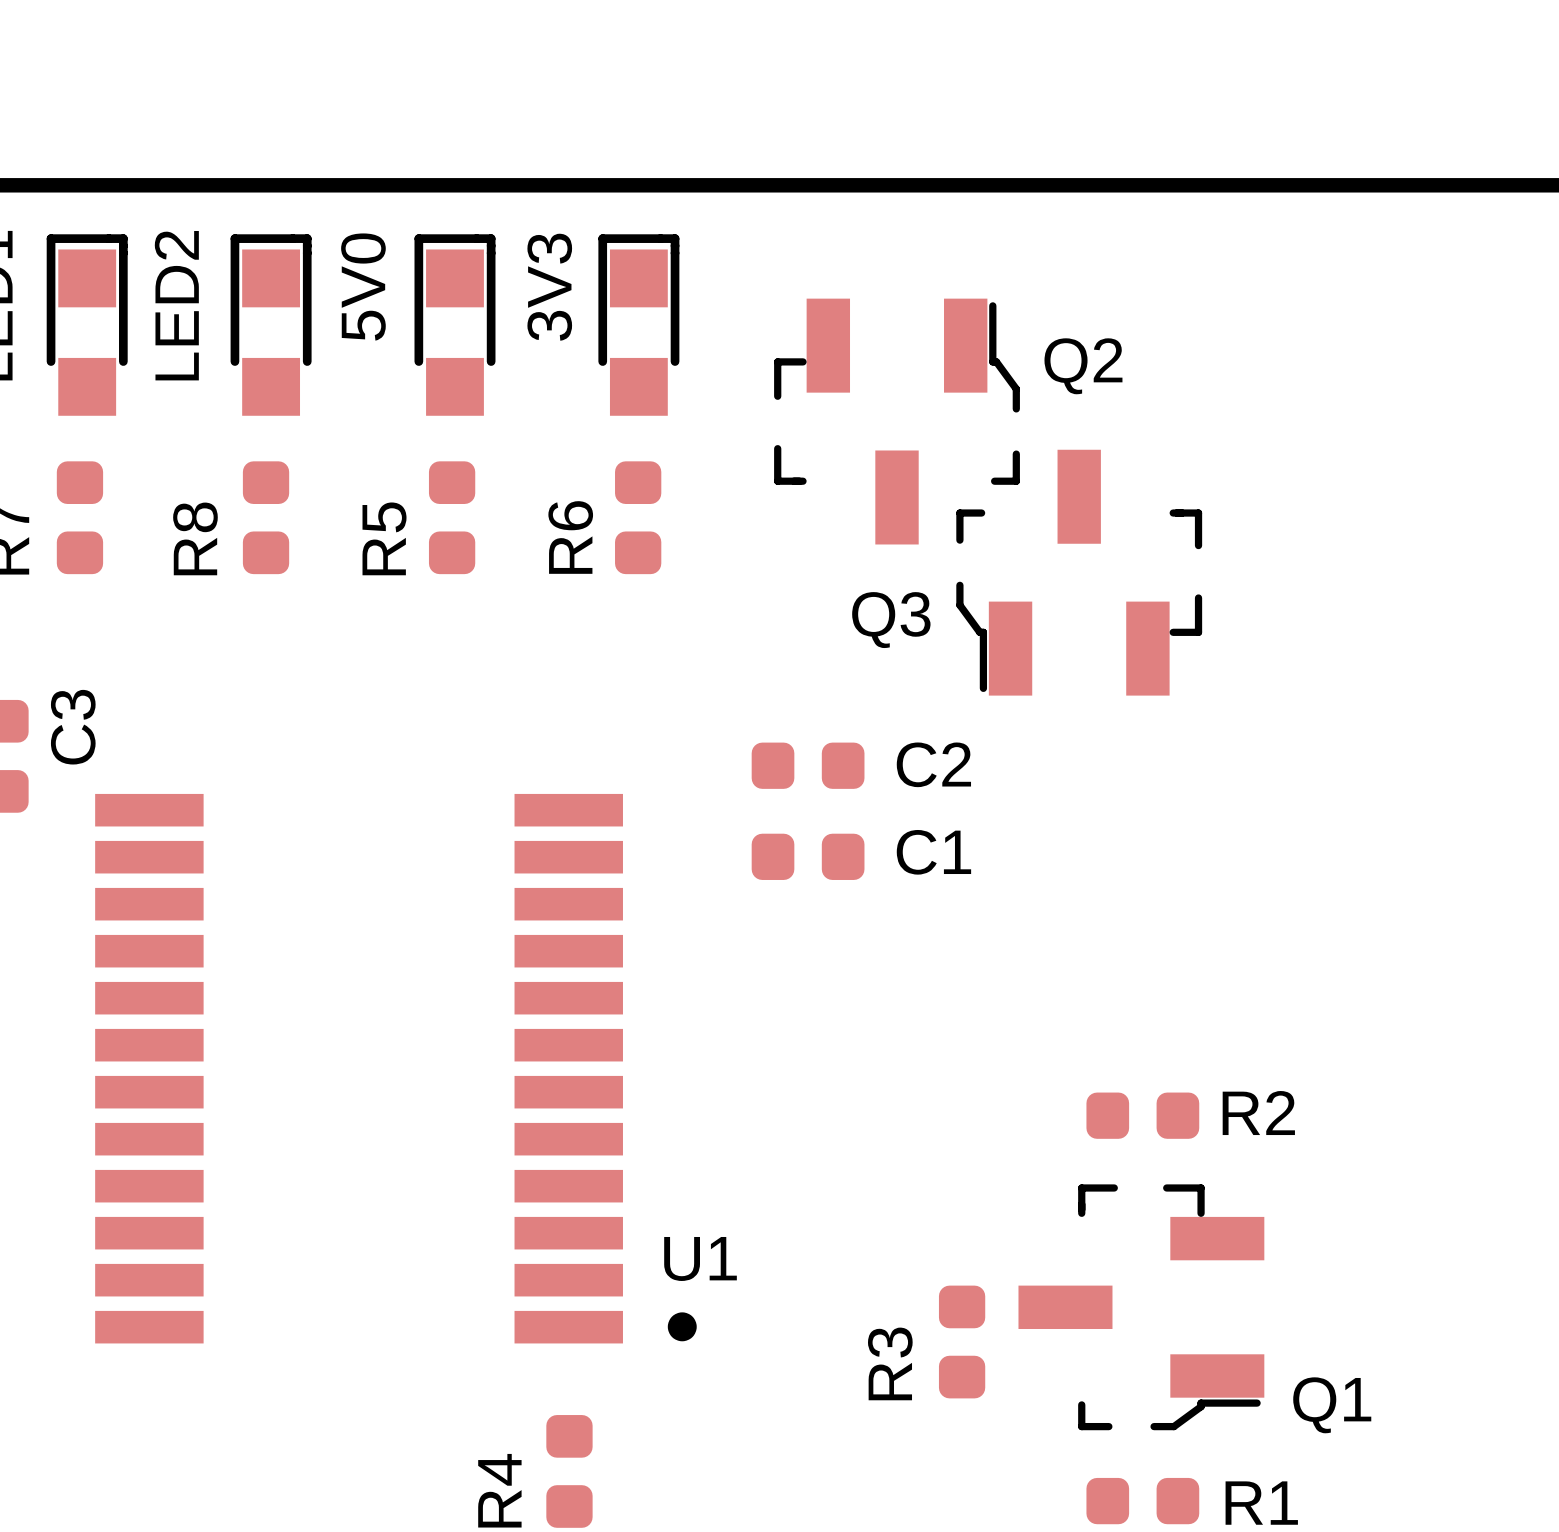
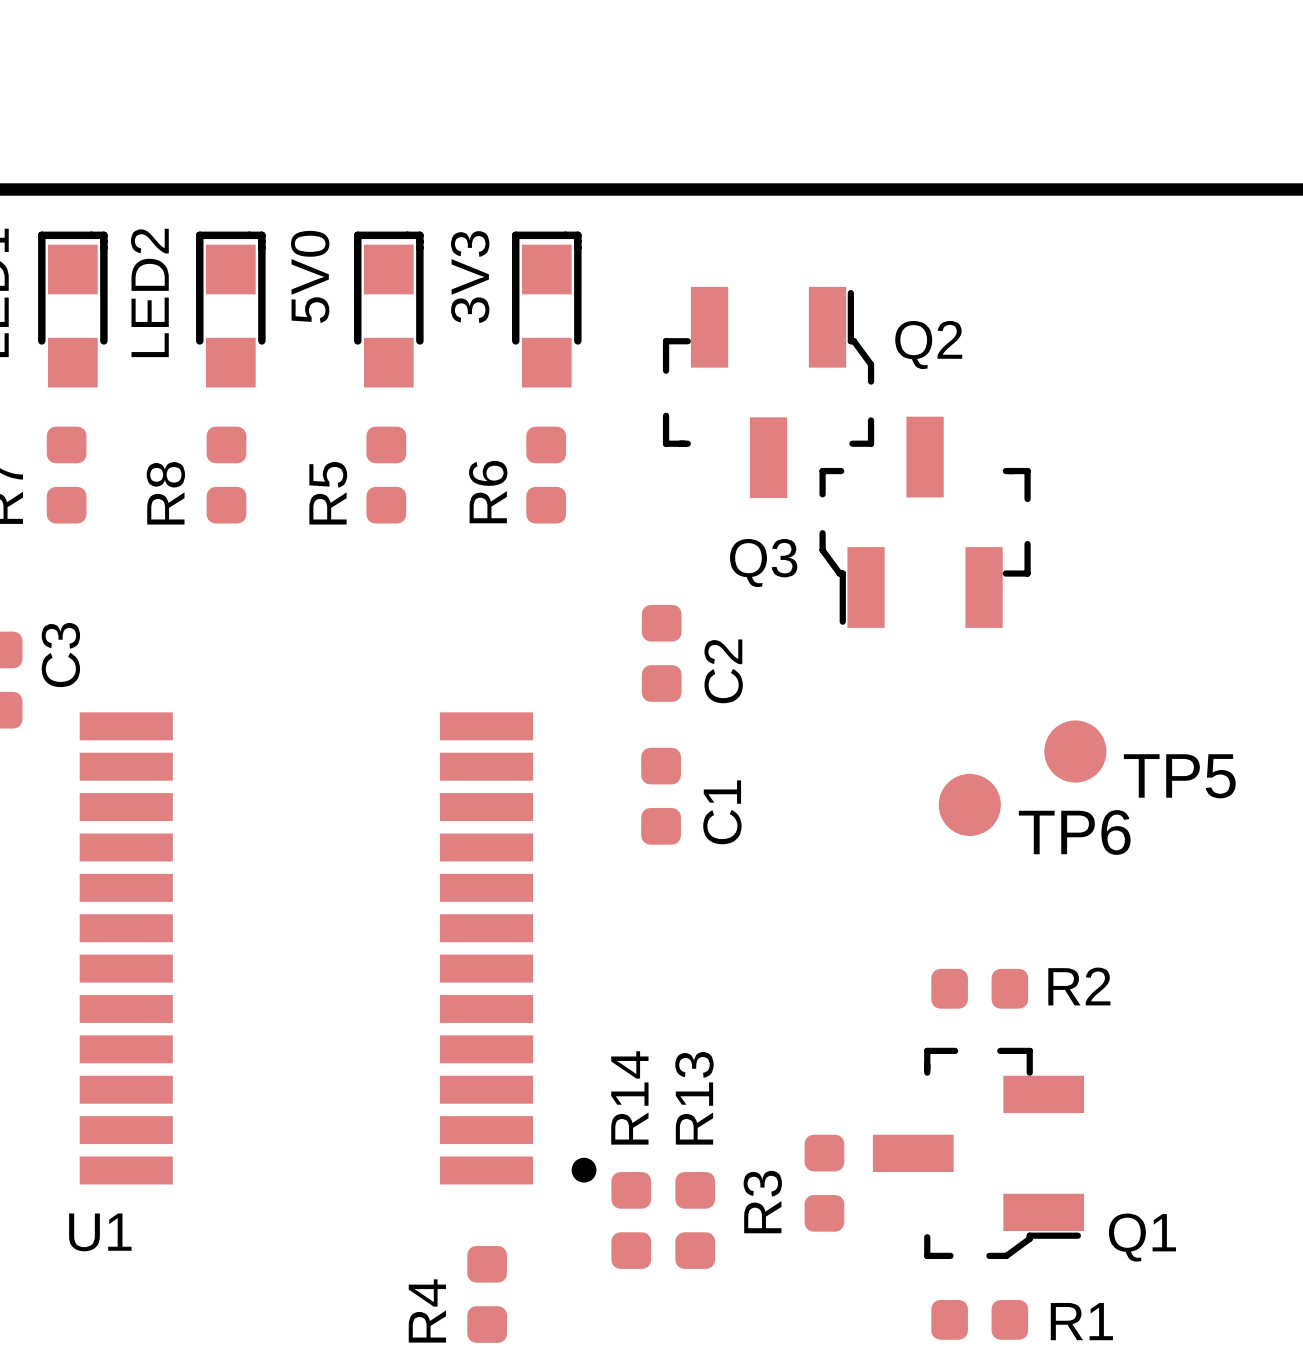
C2 rotation: 0° (808, 765) -> 90° clockwise (661, 653)
TP5: none -> (1075, 751)
C1 rotation: 0° (808, 856) -> 90° clockwise (661, 796)
TP6: none -> (969, 804)
U1 name position: U1 (700, 1258) -> U1 (100, 1232)
R14: none -> (631, 1220)
R13: none -> (695, 1220)

